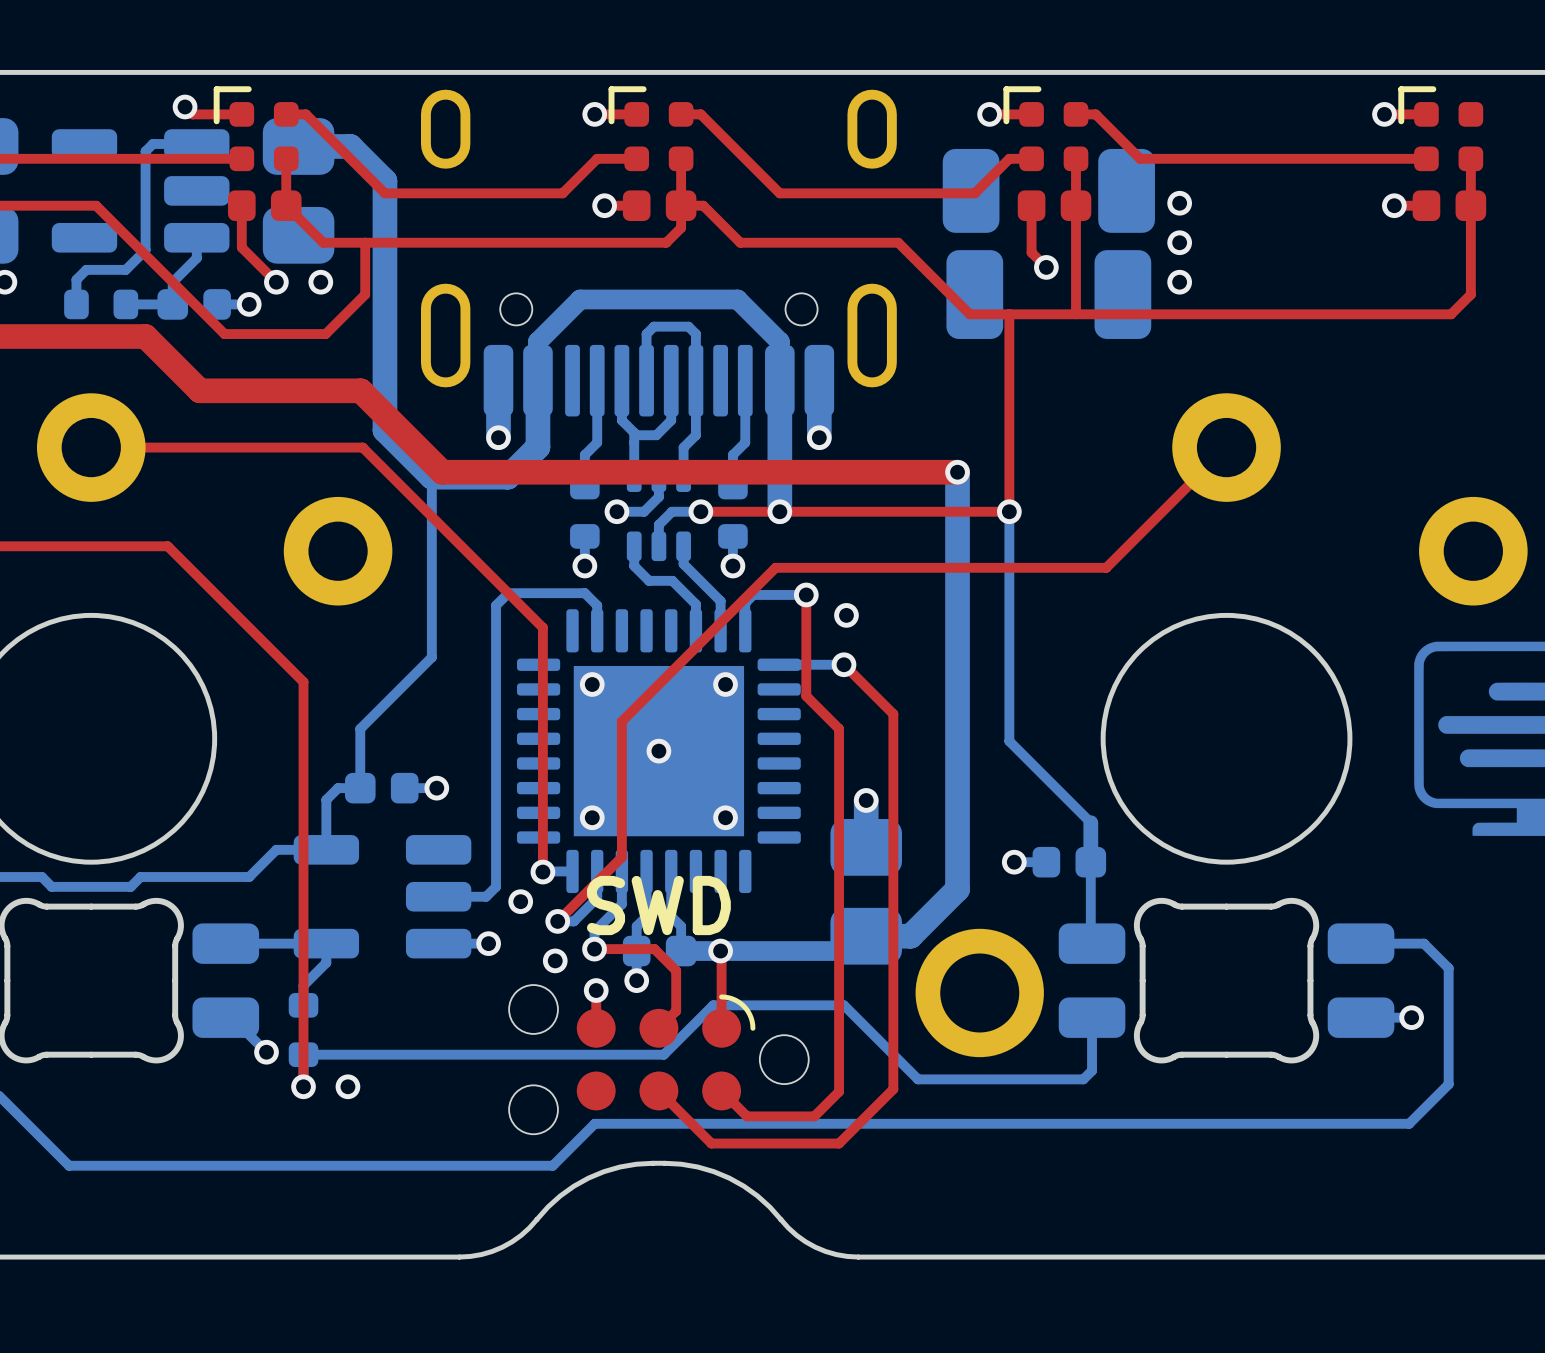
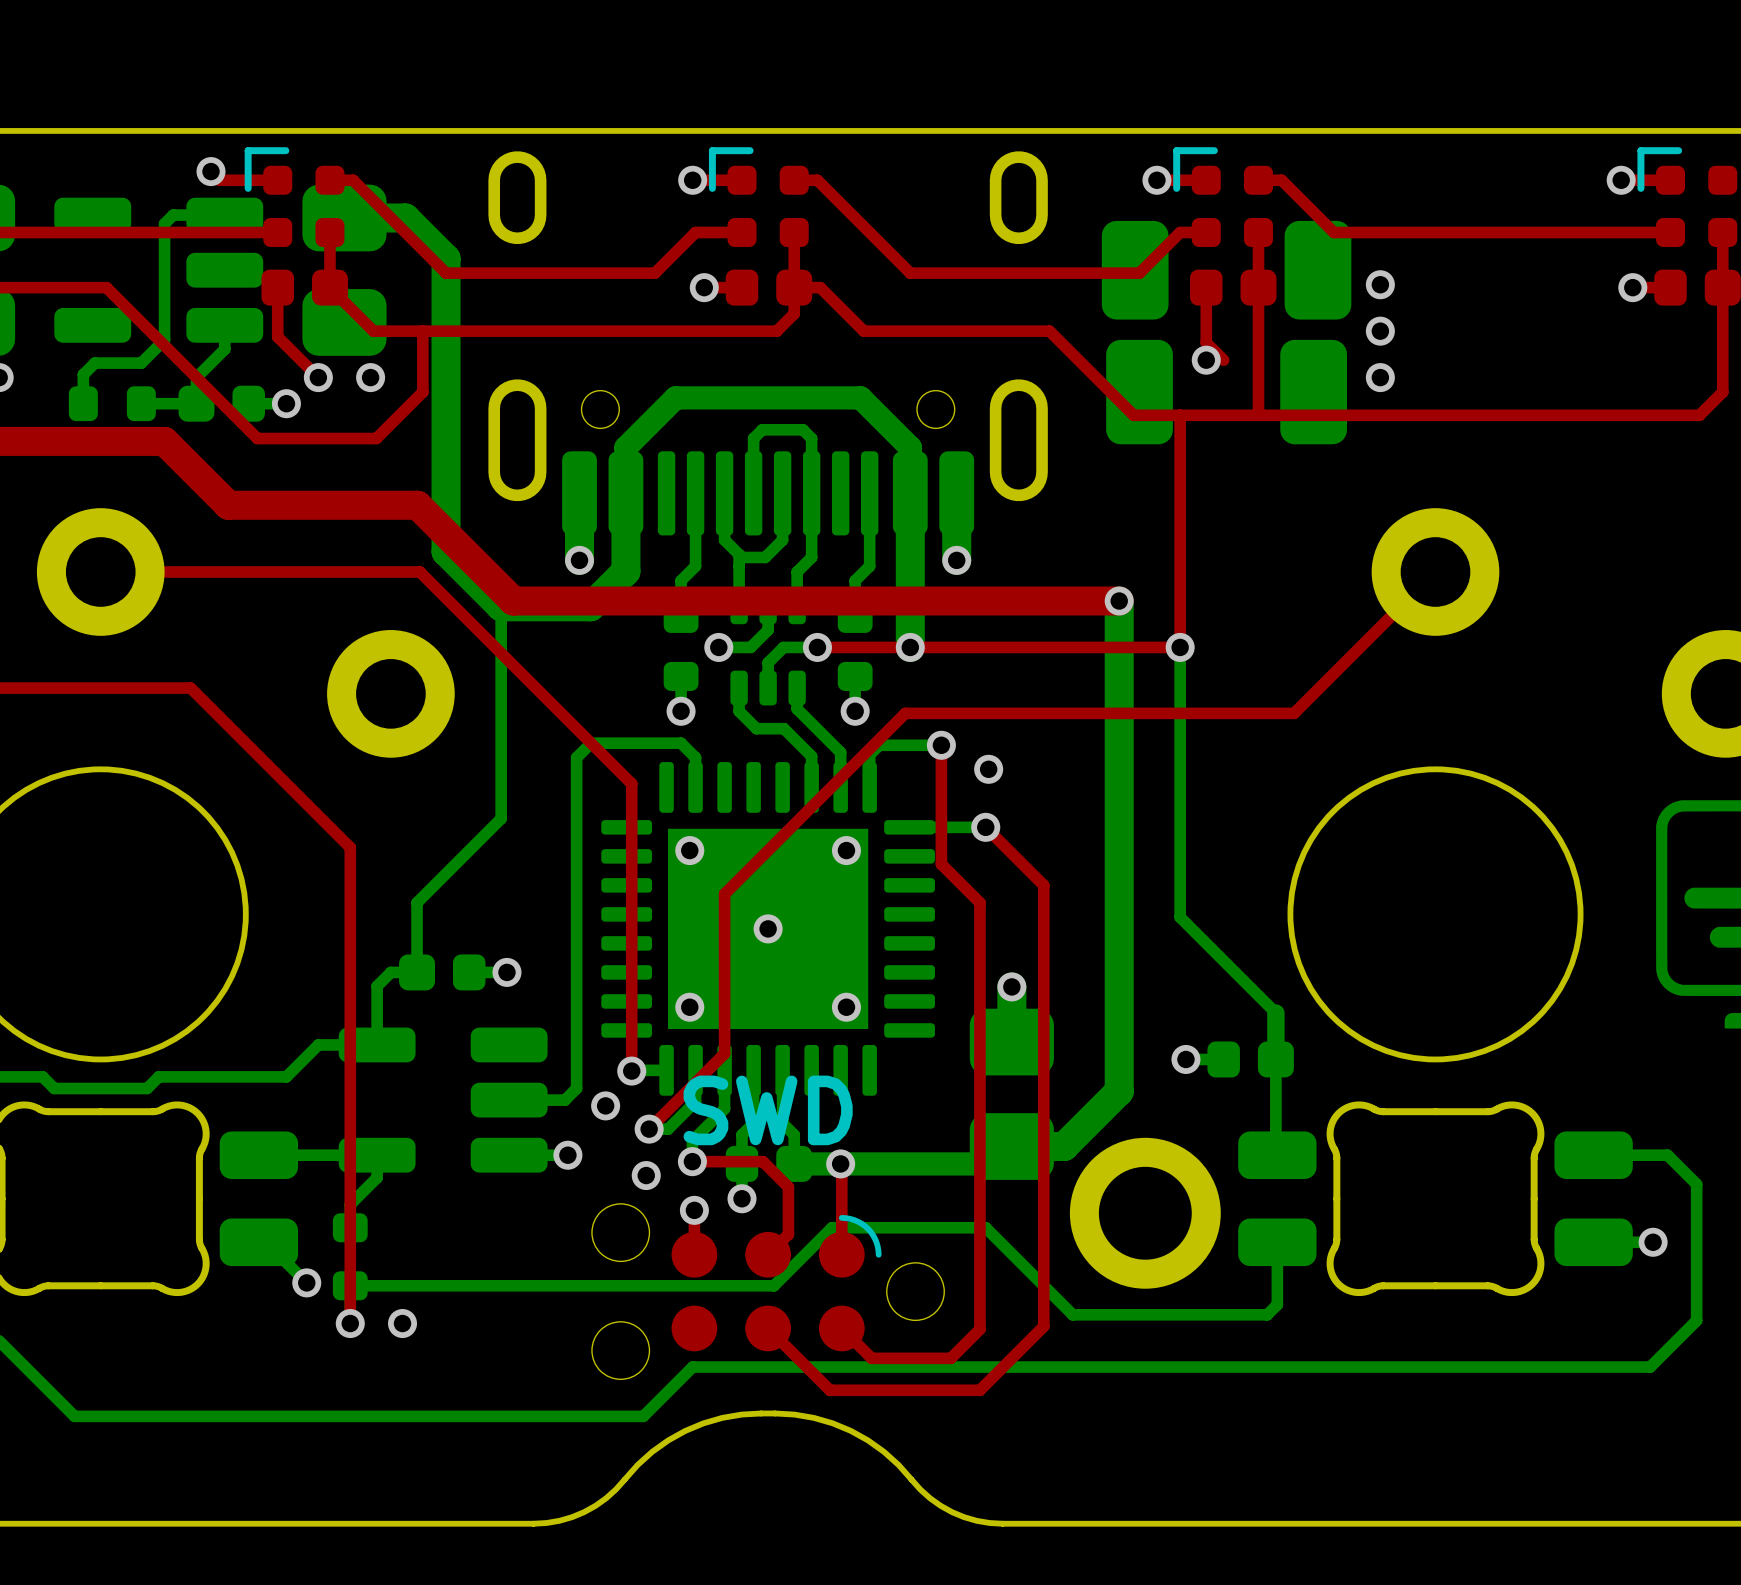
via position: (1046, 267) -> (1206, 360)

